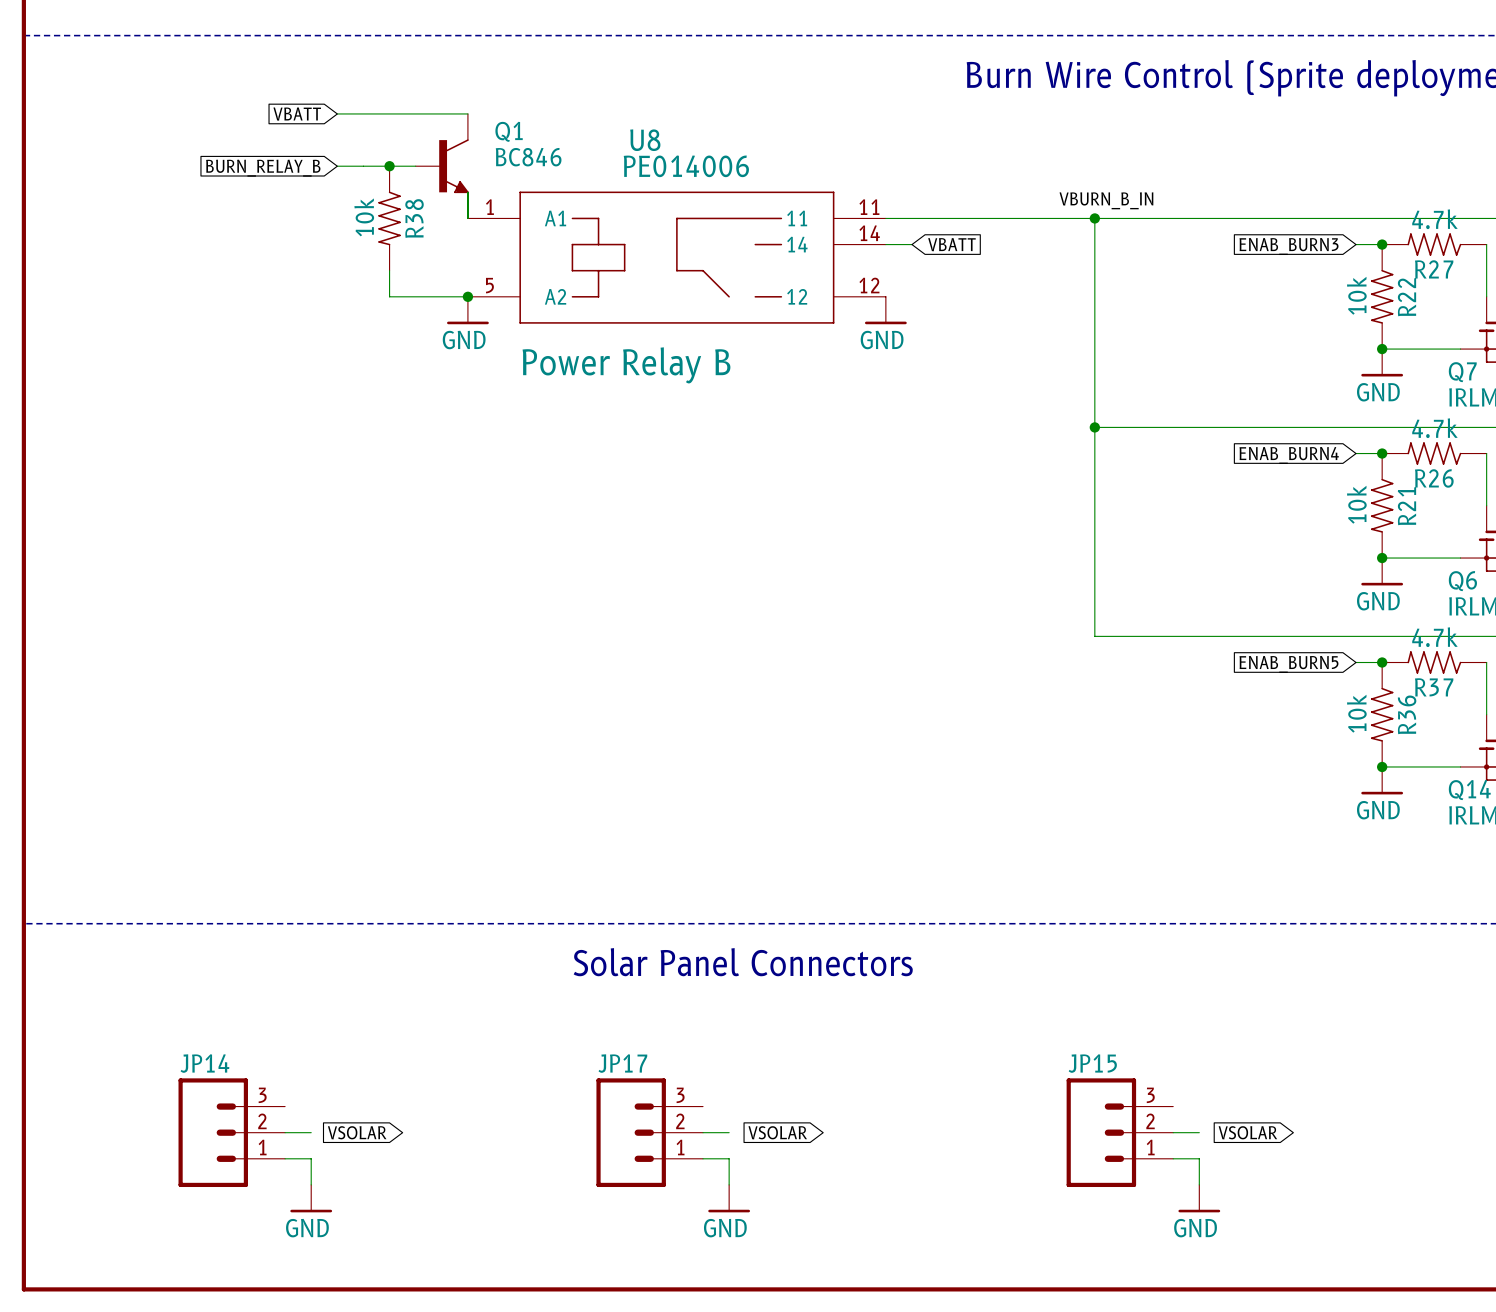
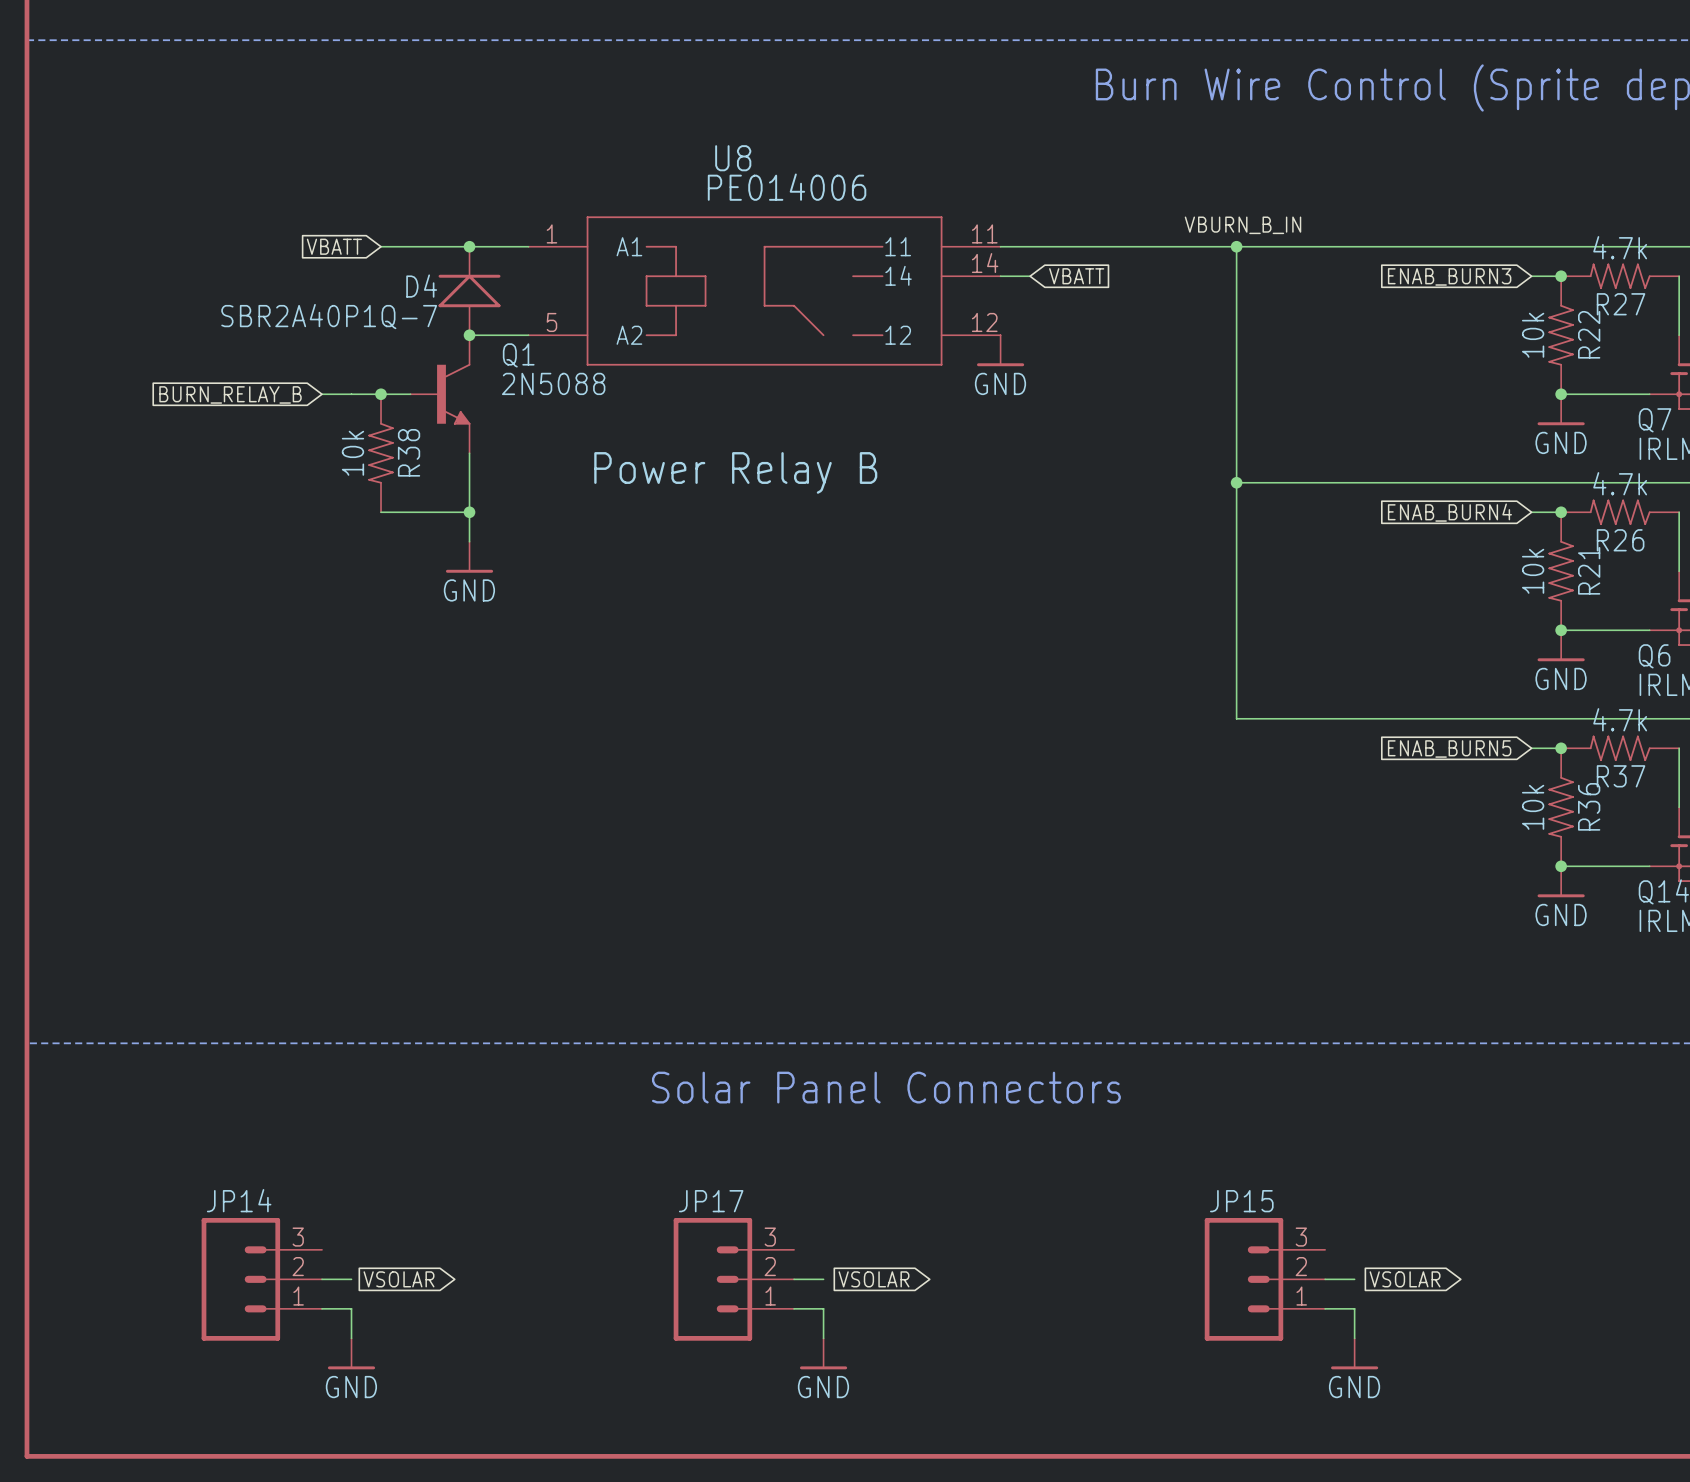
wire: (337, 113) (467, 113) -> none
global label position: VBATT (297, 114) -> VBATT (334, 246)
Q1 value: BC846 (528, 157) -> 2N5088 (553, 383)
wire: (337, 166) (415, 166) -> (322, 394) (410, 394)
junction: (389, 166) -> none
Q1 position: (442, 166) -> (440, 394)
global label position: BURN_RELAY_B (263, 168) -> BURN_RELAY_B (230, 394)
wire: (467, 192) (467, 218) -> (381, 246) (528, 246)
R38 position: (389, 218) -> (381, 453)
junction: none -> (469, 246)
D4: none -> SBR2A40P1Q-7 (469, 290)
wire: (389, 270) (389, 296) (415, 296) -> none
junction: none -> (469, 335)
junction: (467, 296) -> none
power symbol position: GND (467, 310) -> GND (469, 557)
junction: none -> (381, 394)
text position: Power Relay B (626, 365) -> Power Relay B (735, 472)
wire: none -> (469, 453) (469, 541)
wire: none -> (381, 512) (469, 512)
junction: none -> (469, 512)

